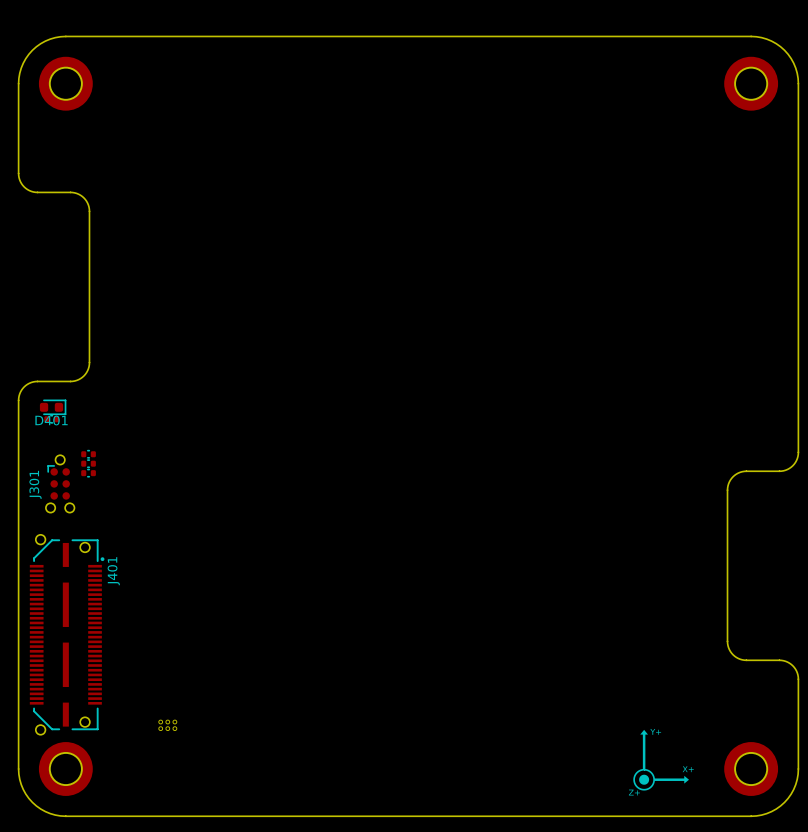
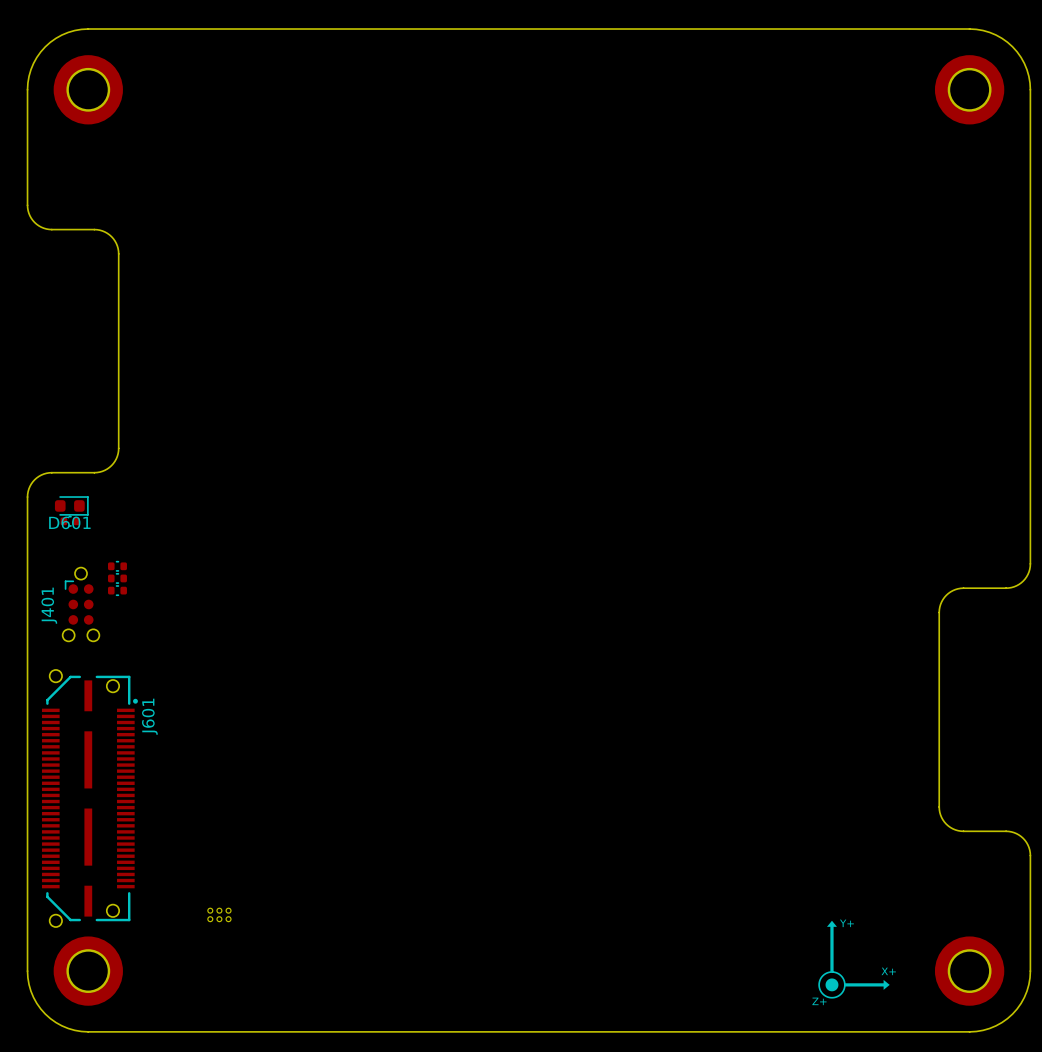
D401 name: D401 (51, 420) -> D601 (69, 522)
J301 name: J301 (35, 484) -> J401 (49, 605)
J401 name: J401 (113, 571) -> J601 (149, 716)

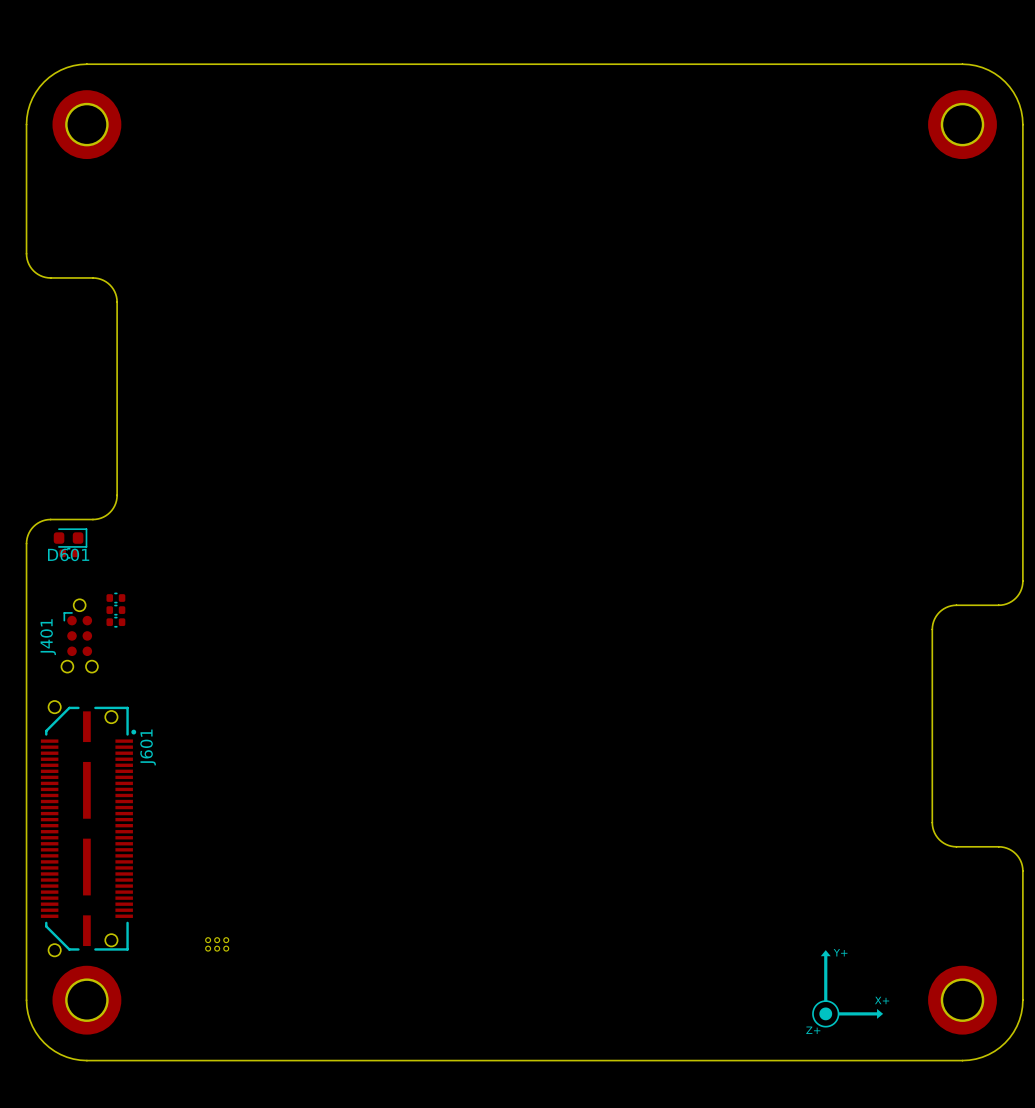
part footprint: [27, 28, 1031, 1033] -> [26, 63, 1024, 1061]

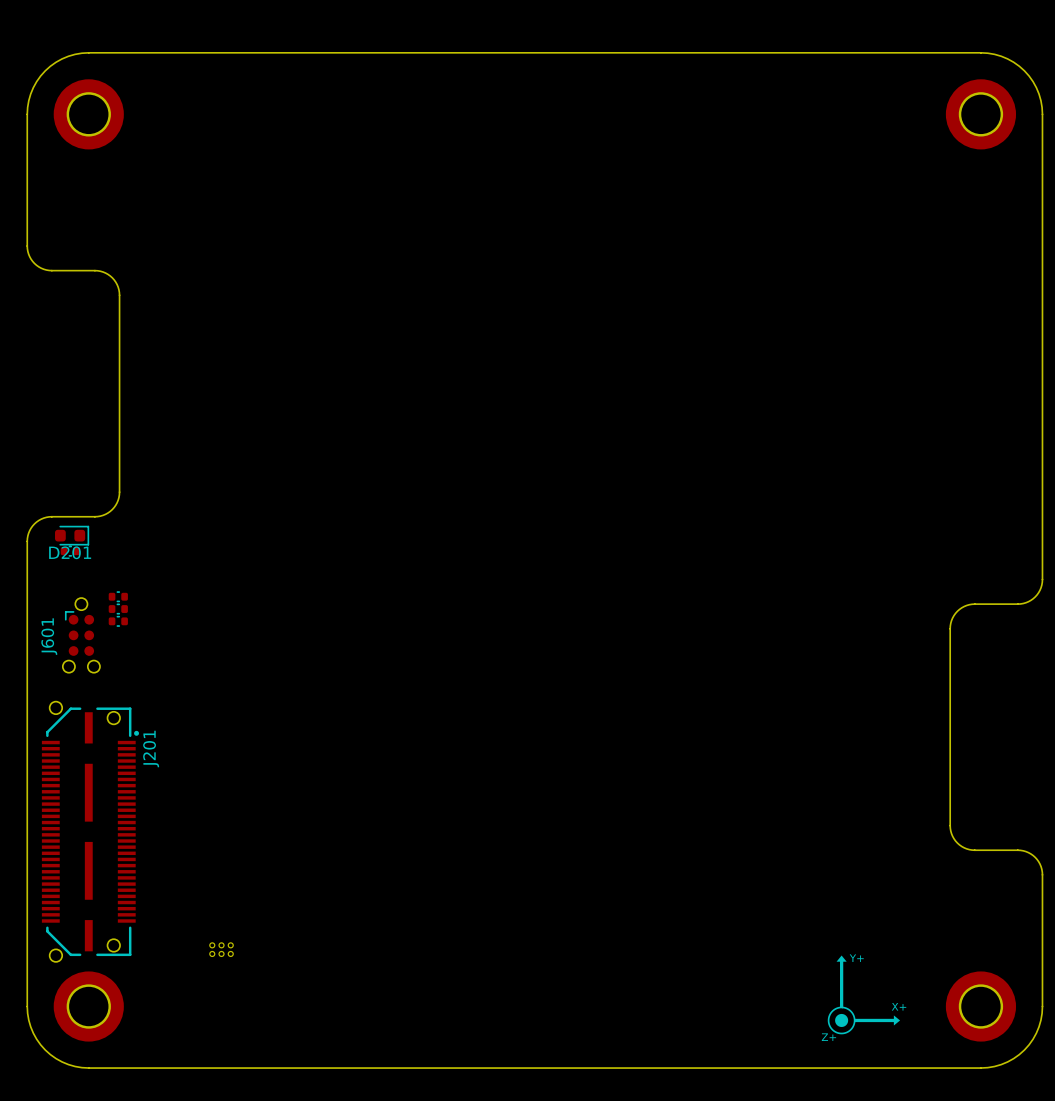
D601 name: D601 (68, 554) -> D201 (70, 552)
J401 name: J401 (48, 637) -> J601 (49, 636)
J601 name: J601 (148, 747) -> J201 (151, 749)

